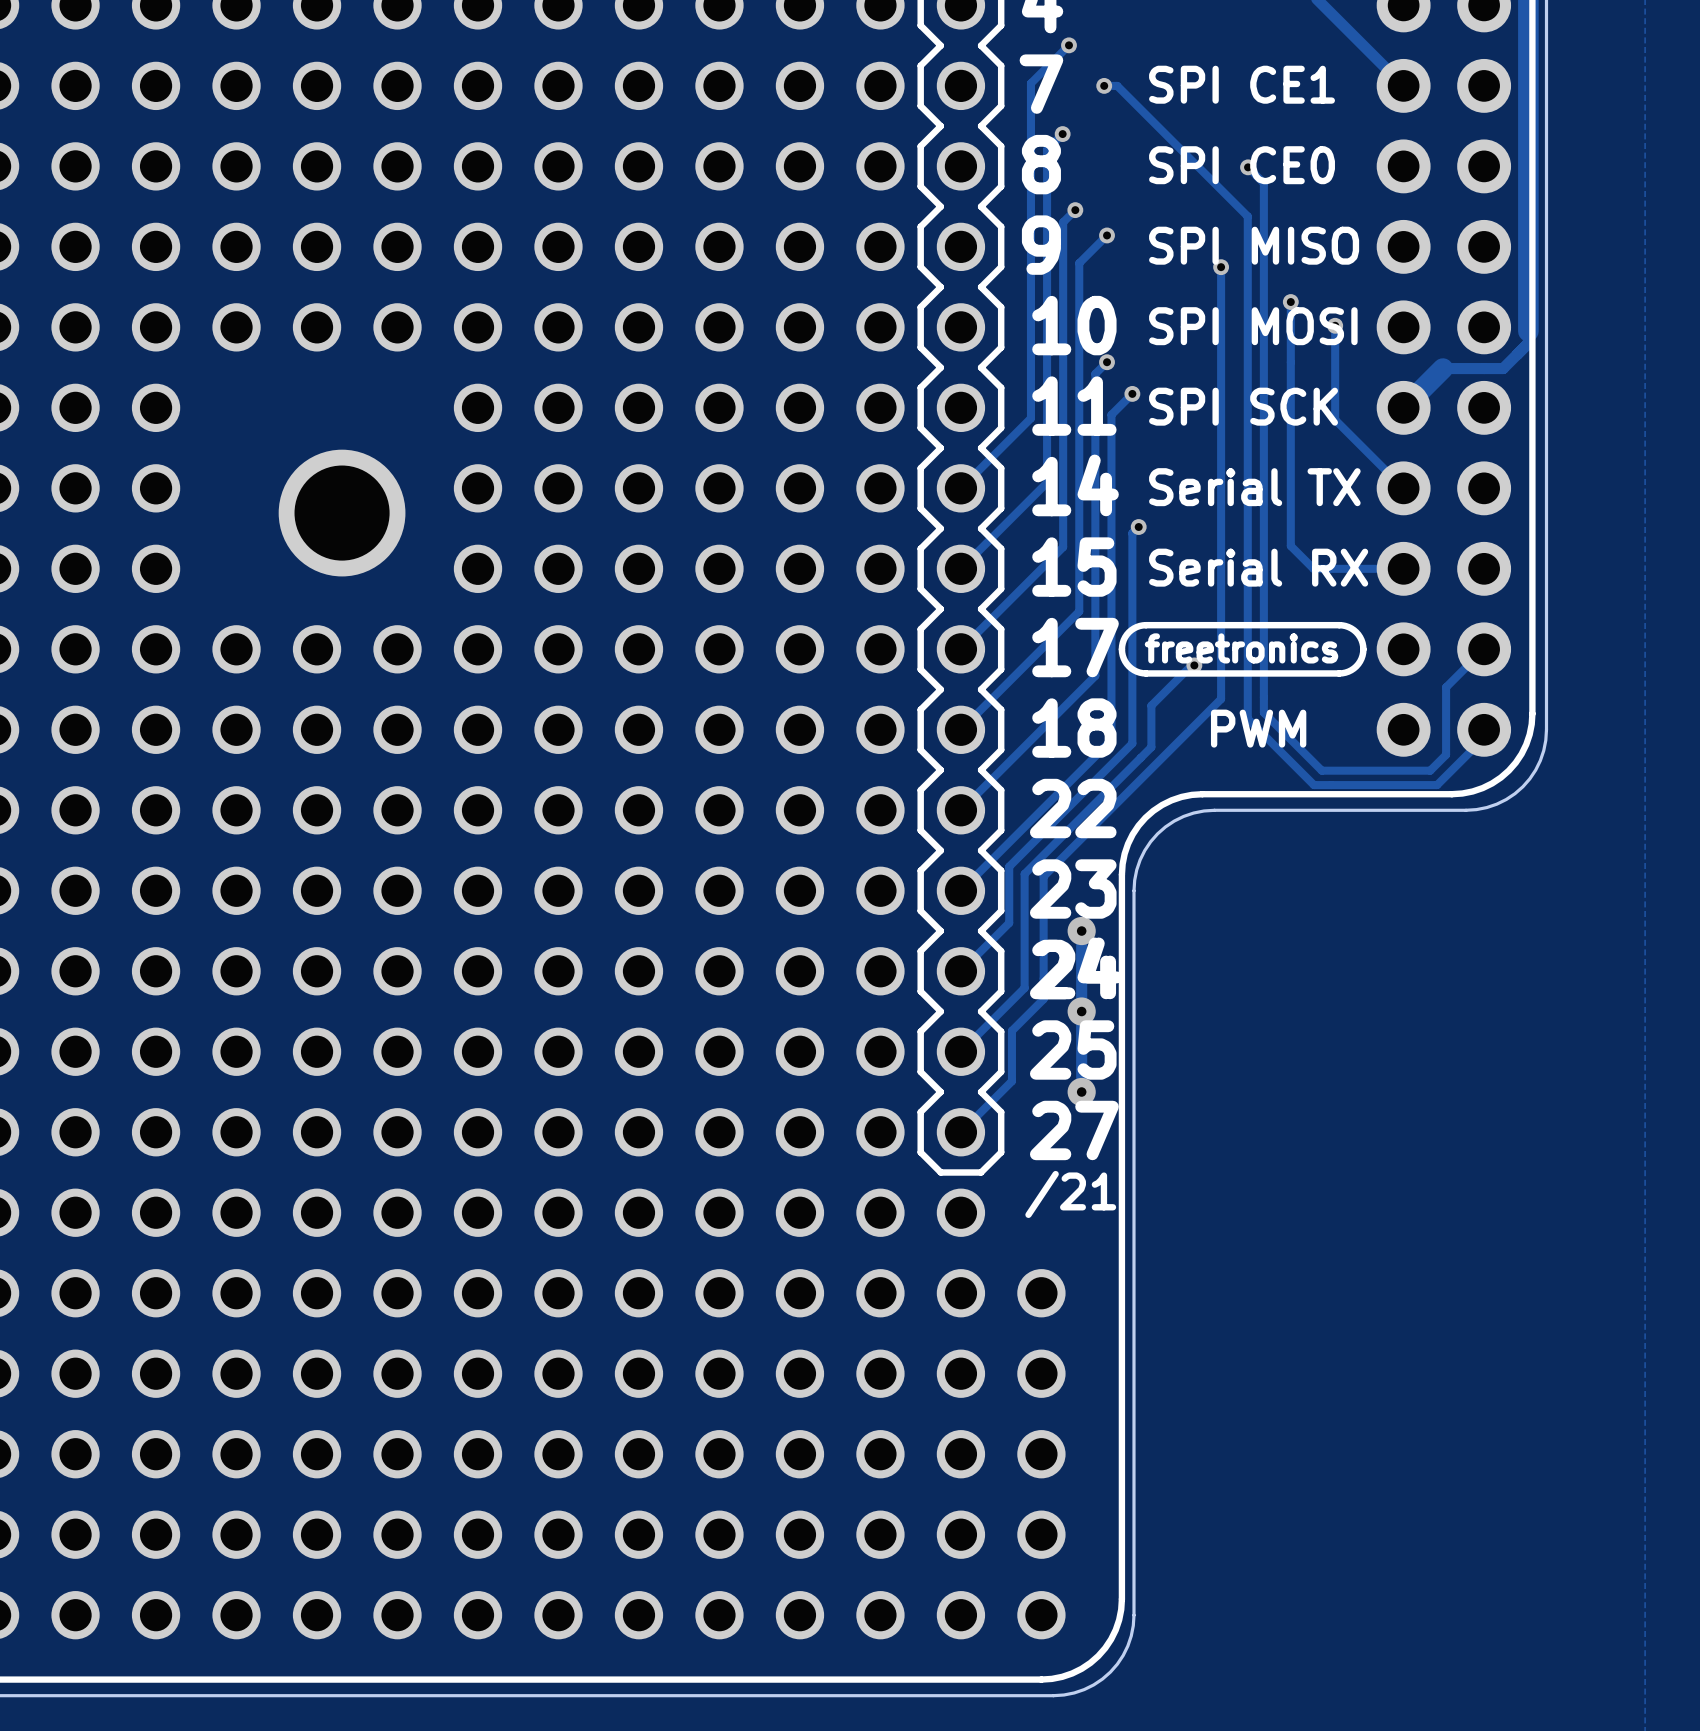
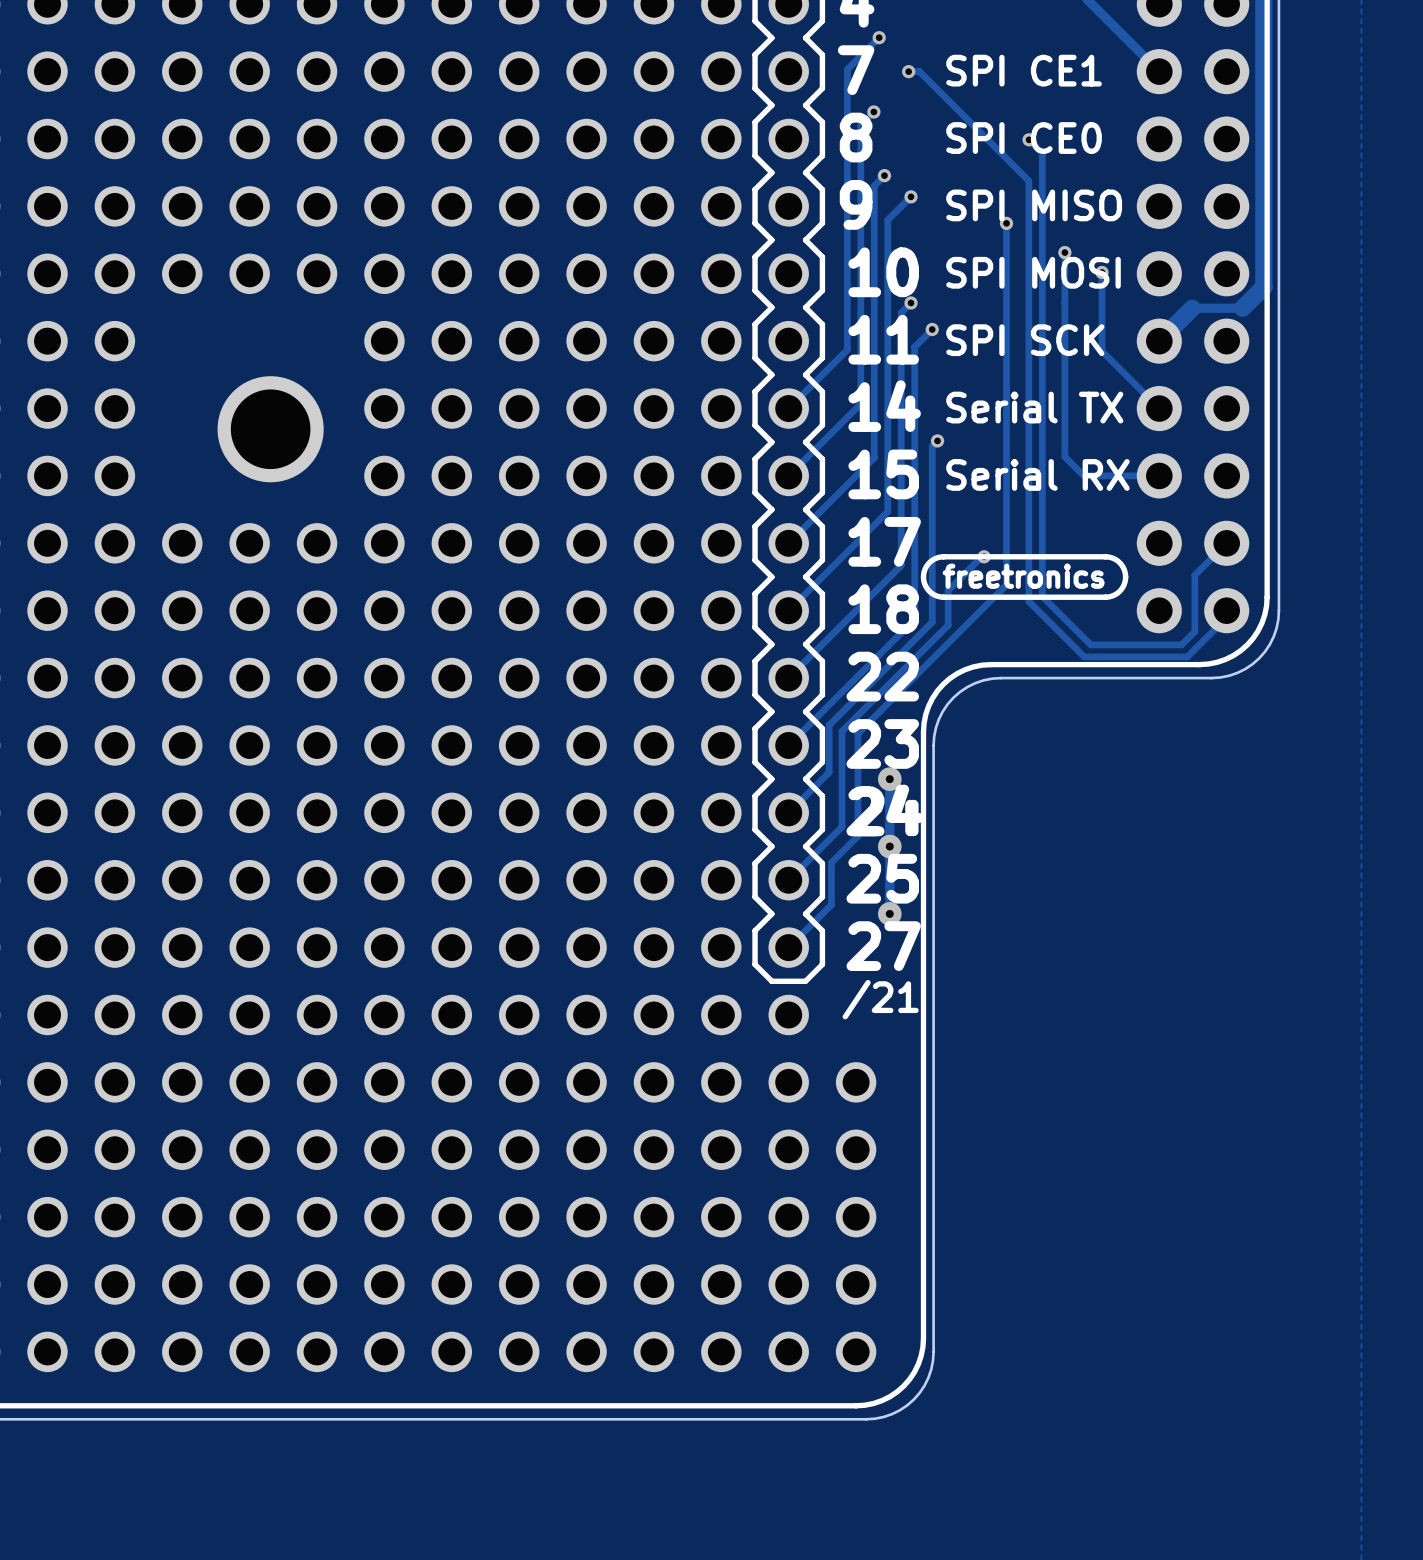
track width: thin (1528, 343) (1503, 368) -> thick (1263, 287) (1242, 308)
drawing position: (1242, 649) -> (1024, 577)
text: PWM (1258, 728) -> none

